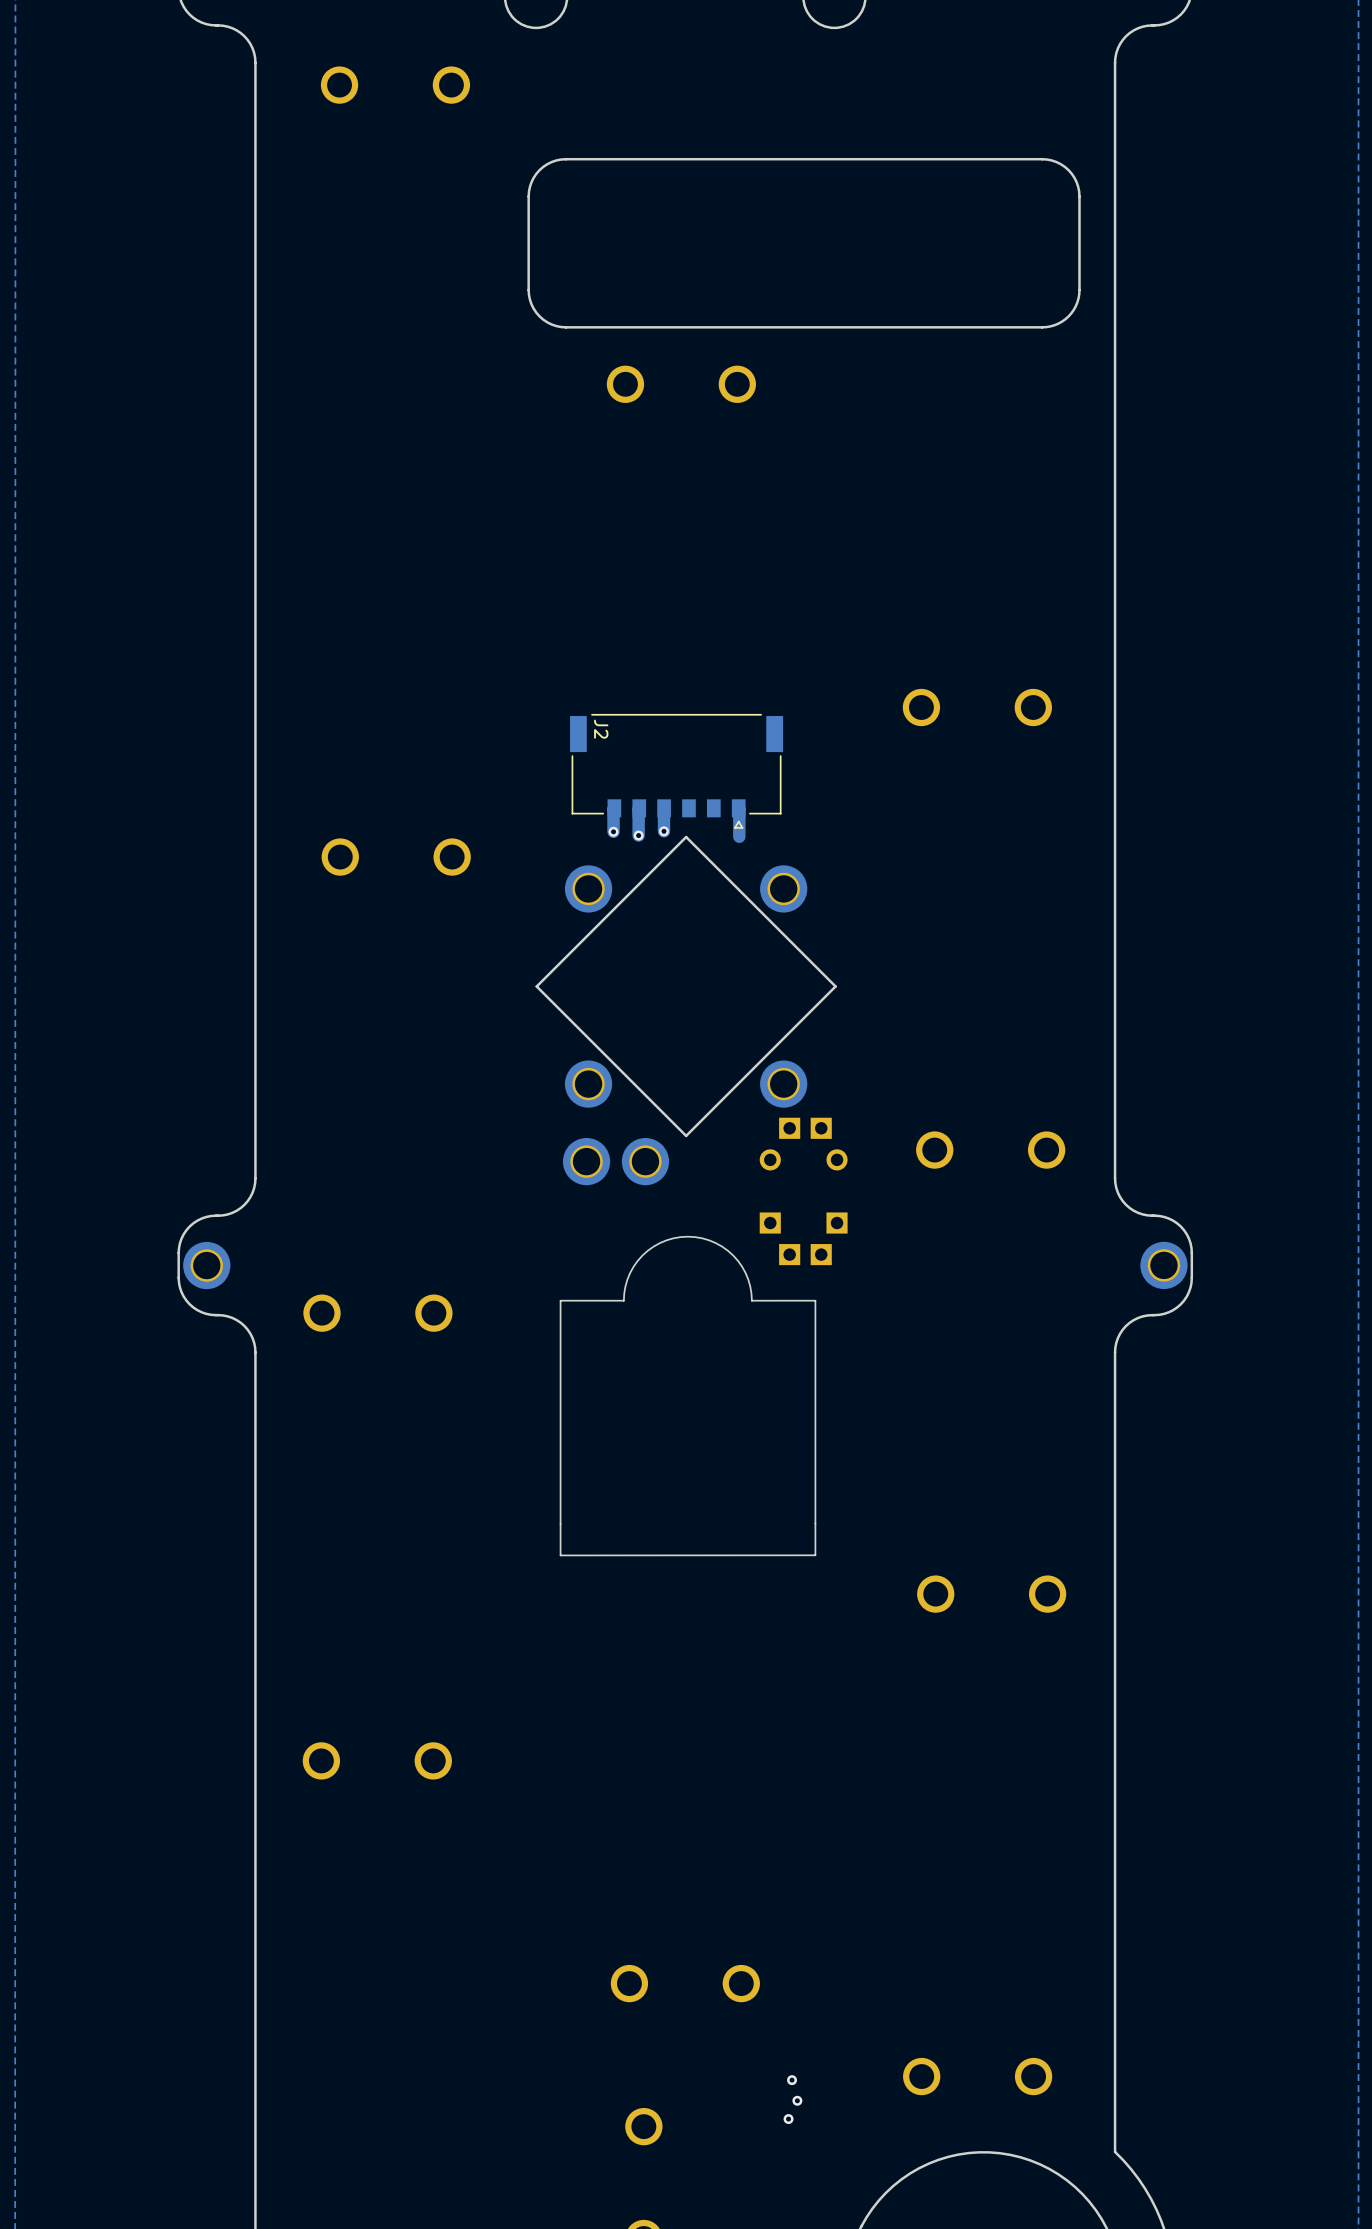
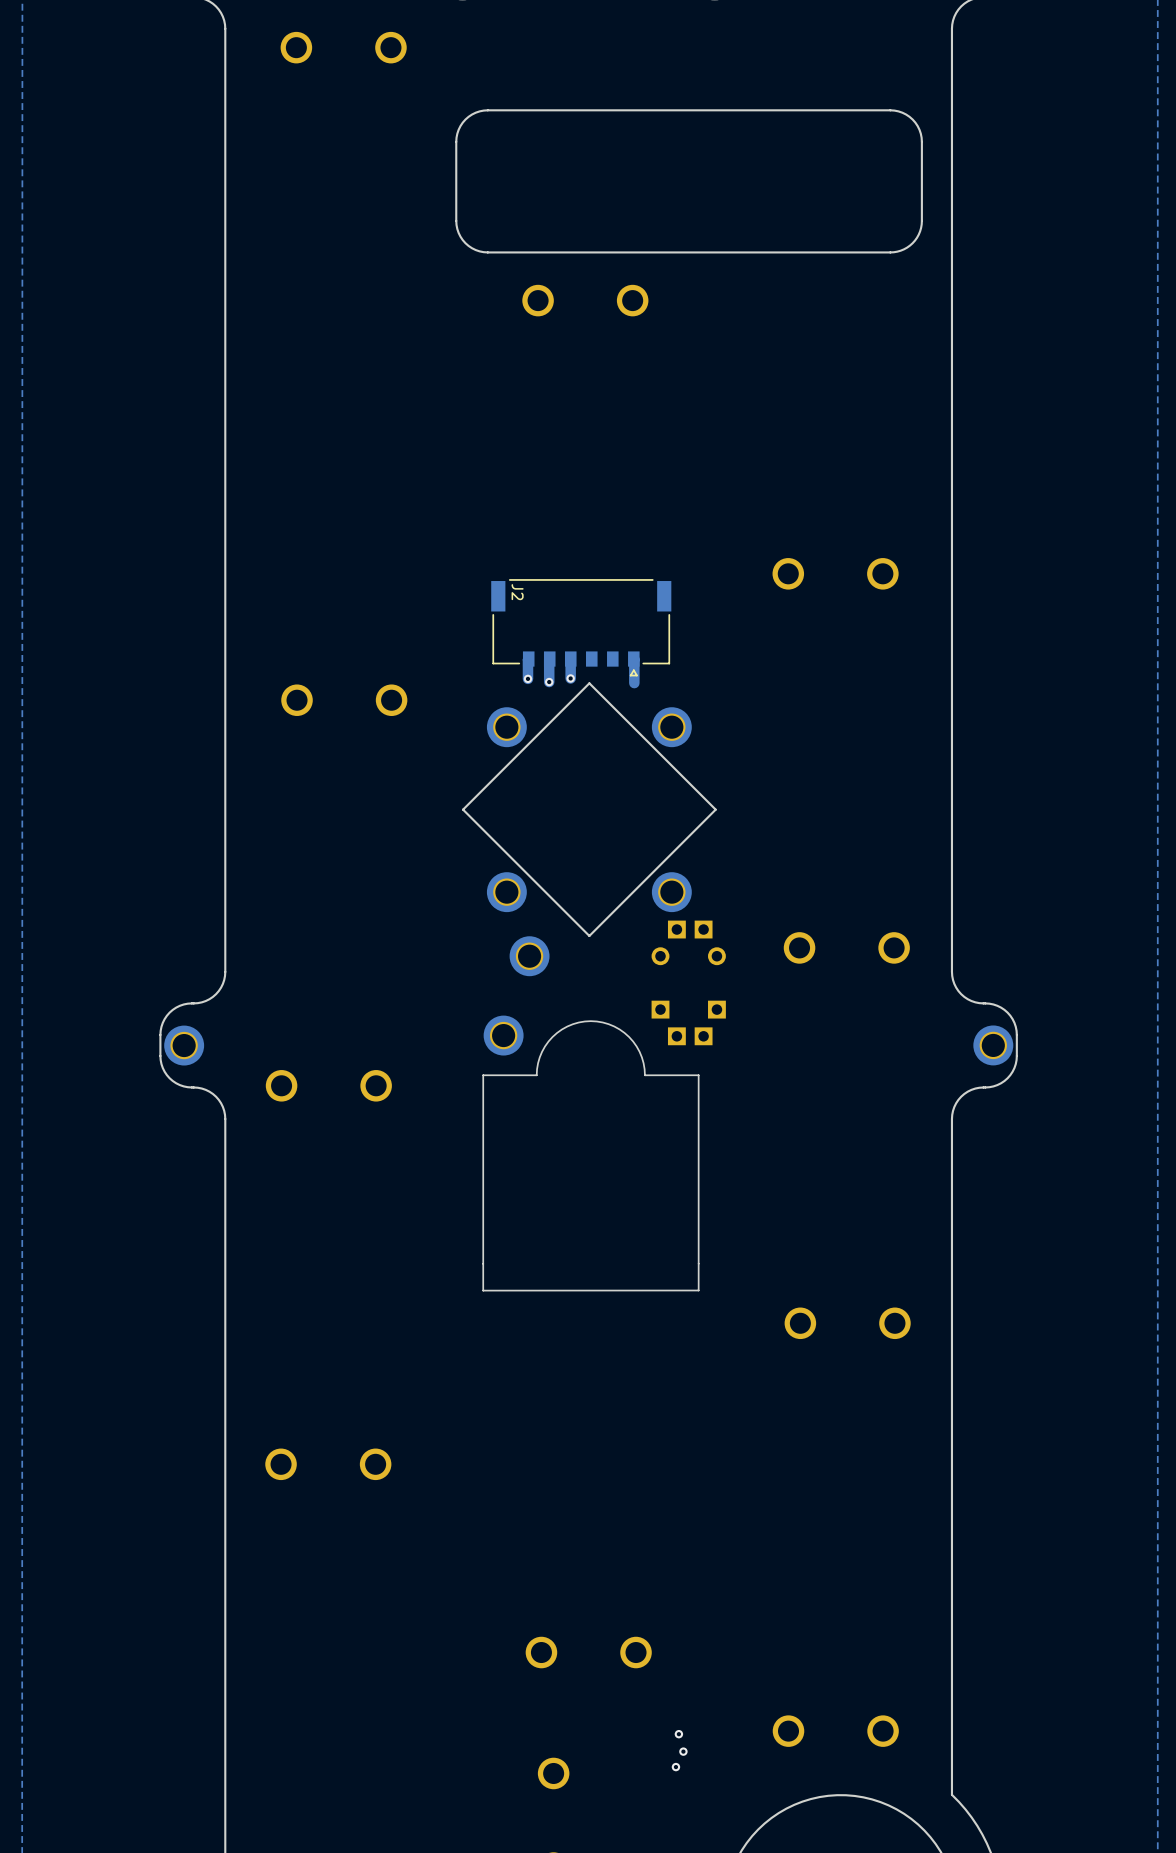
part: none -> (529, 956)
part: (586, 1161) -> none
part: (645, 1161) -> none
part: none -> (503, 1035)

